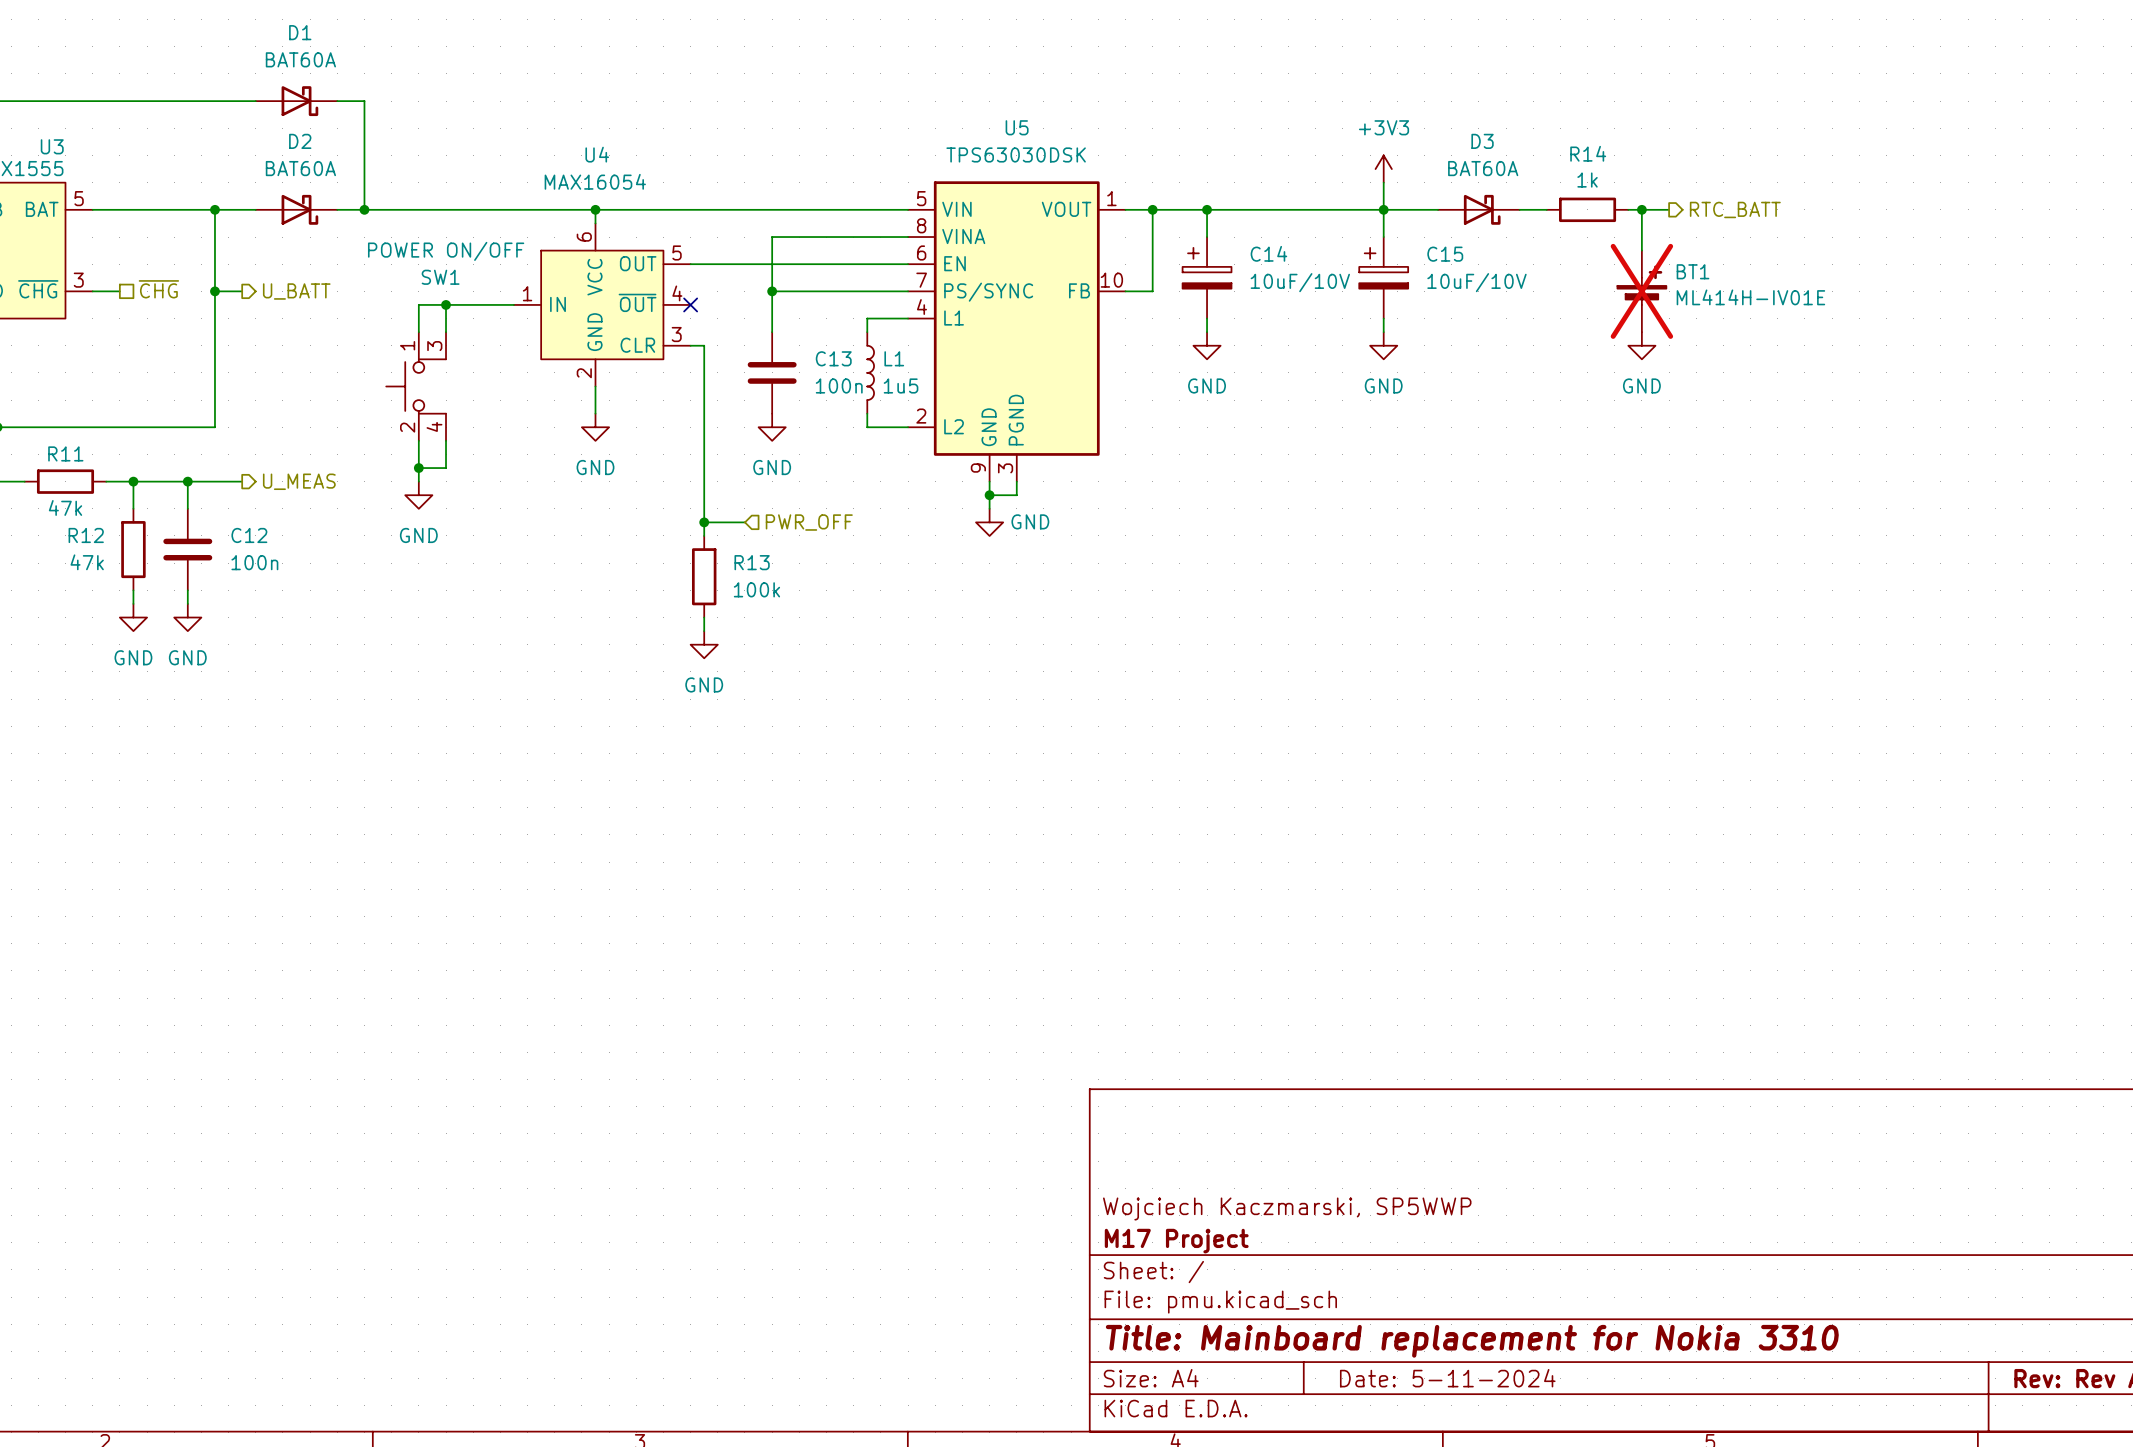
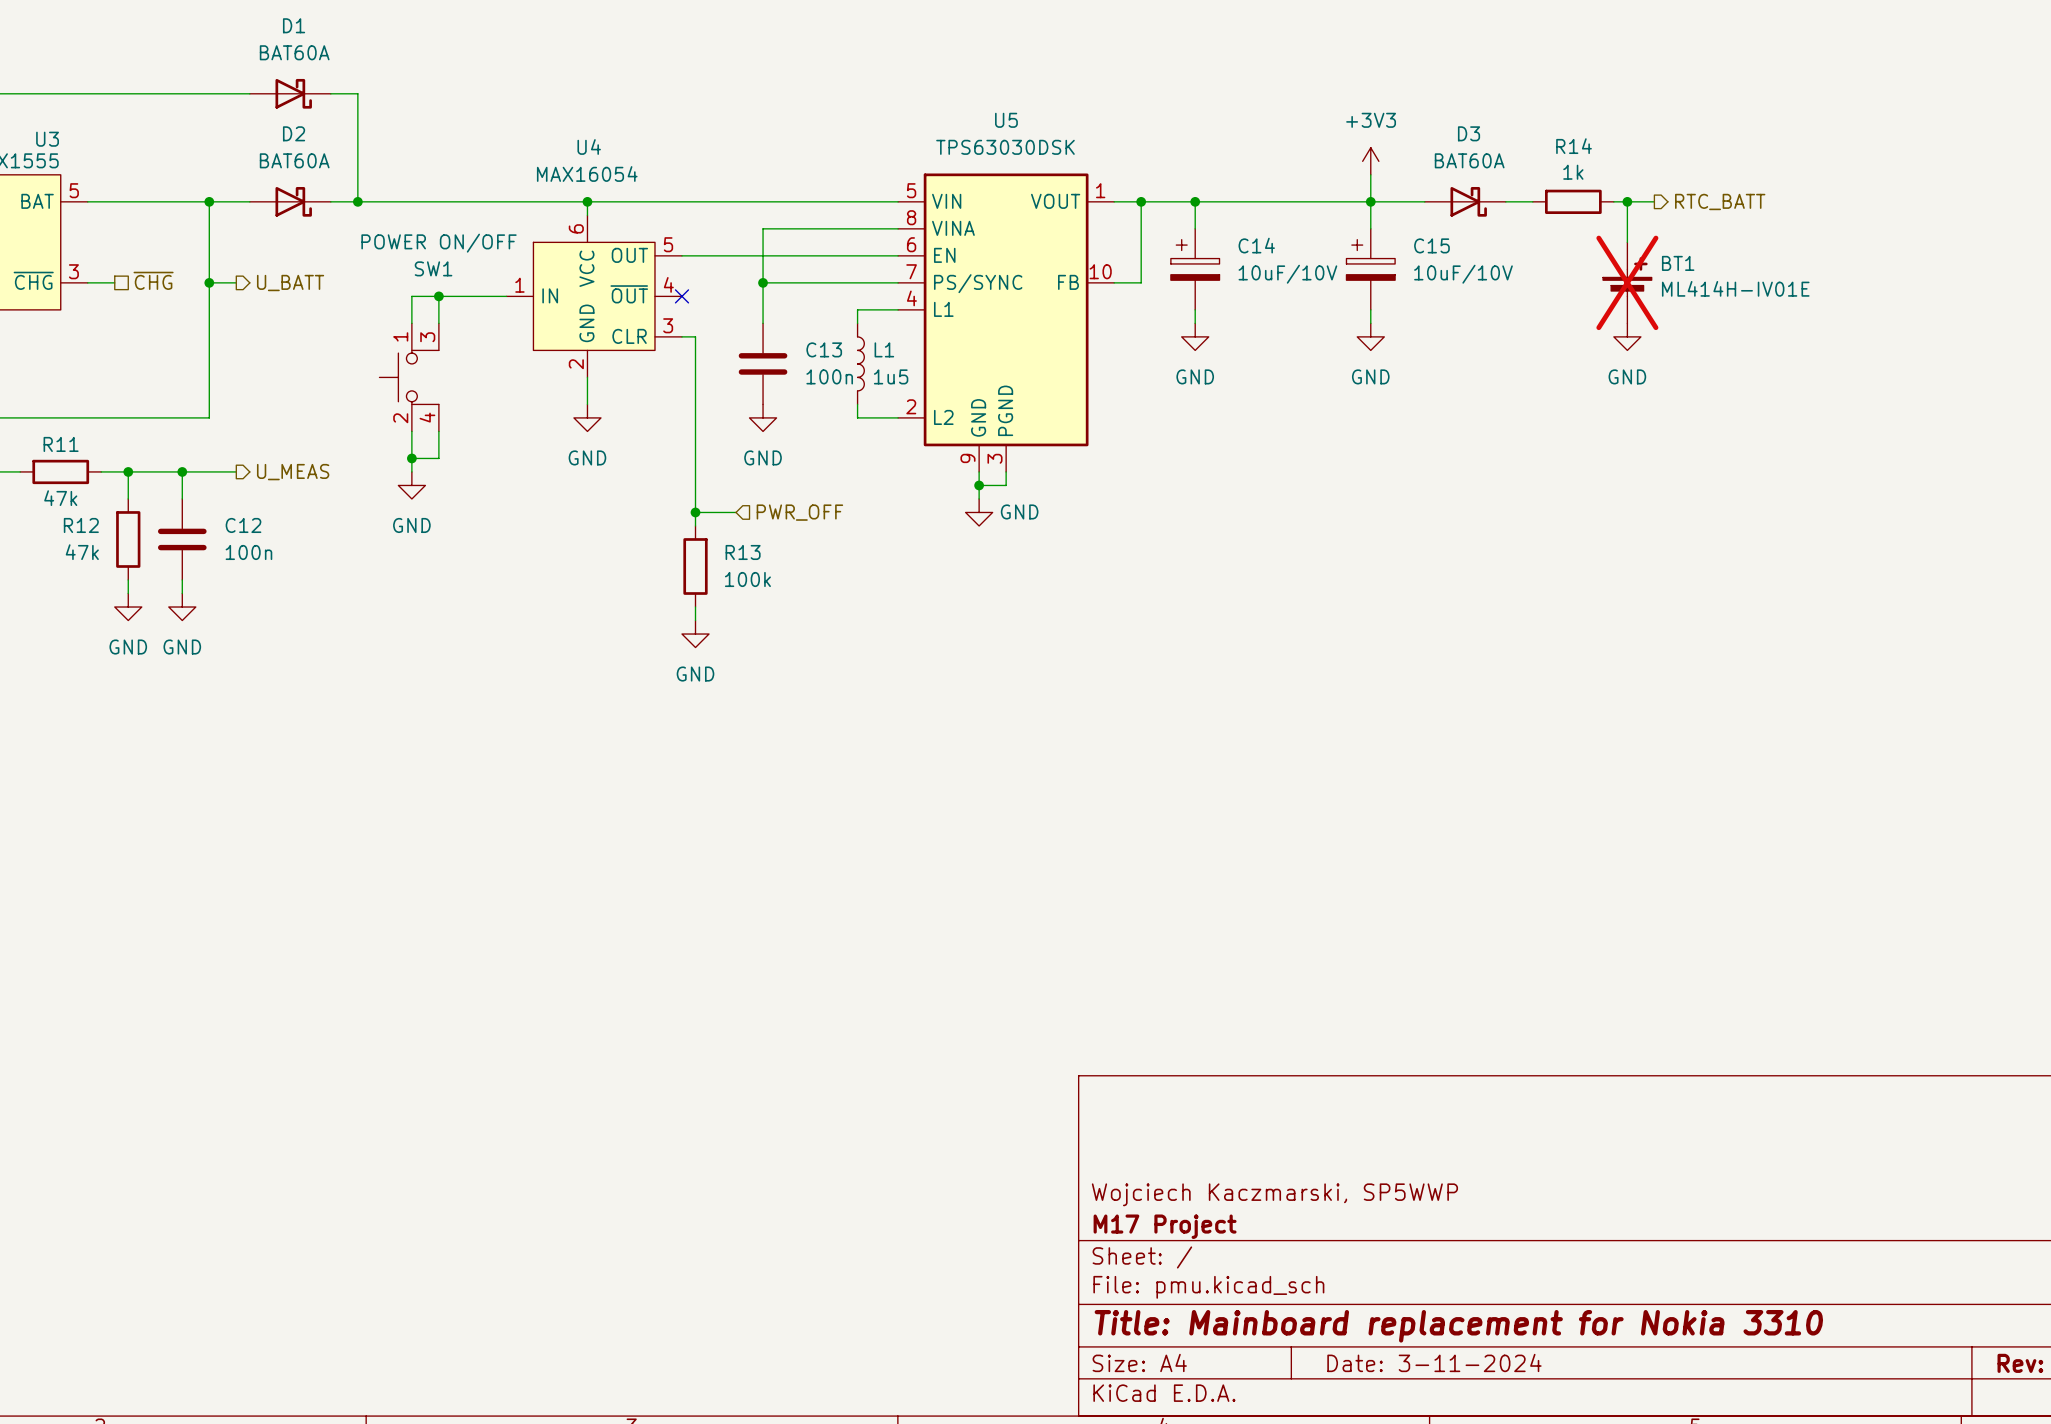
title block: Date: 5-11-2024 (1447, 1378) -> Date: 3-11-2024 (1434, 1362)

